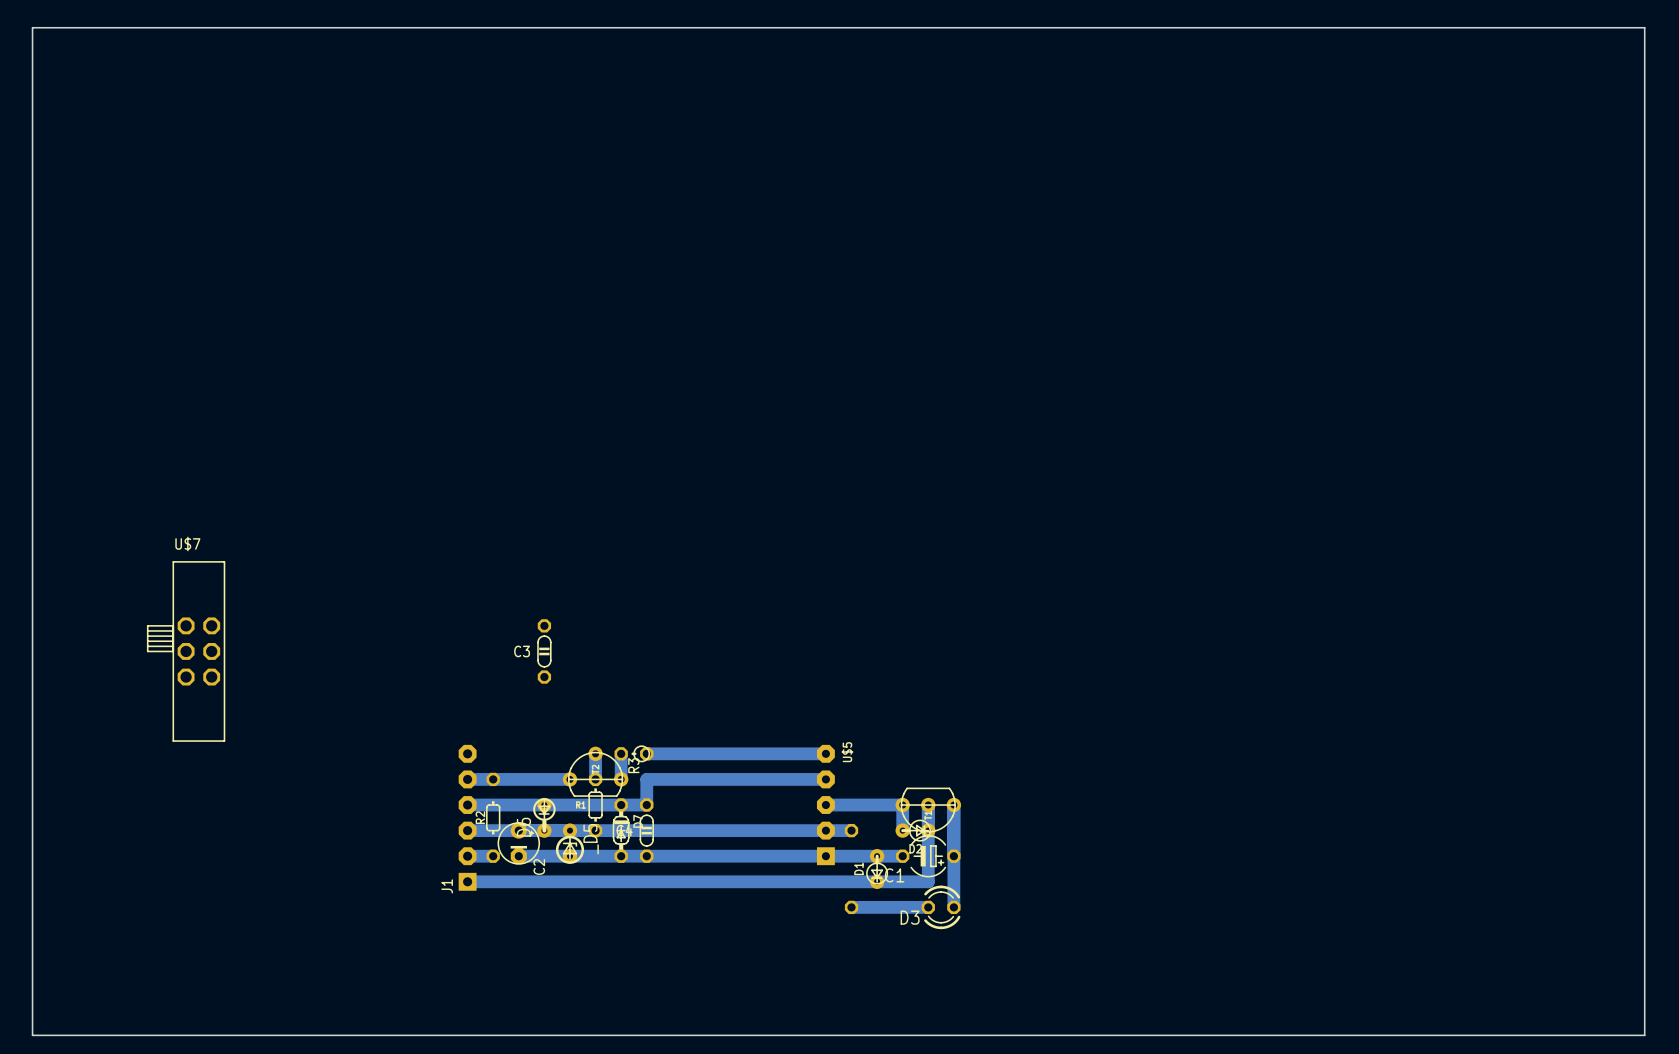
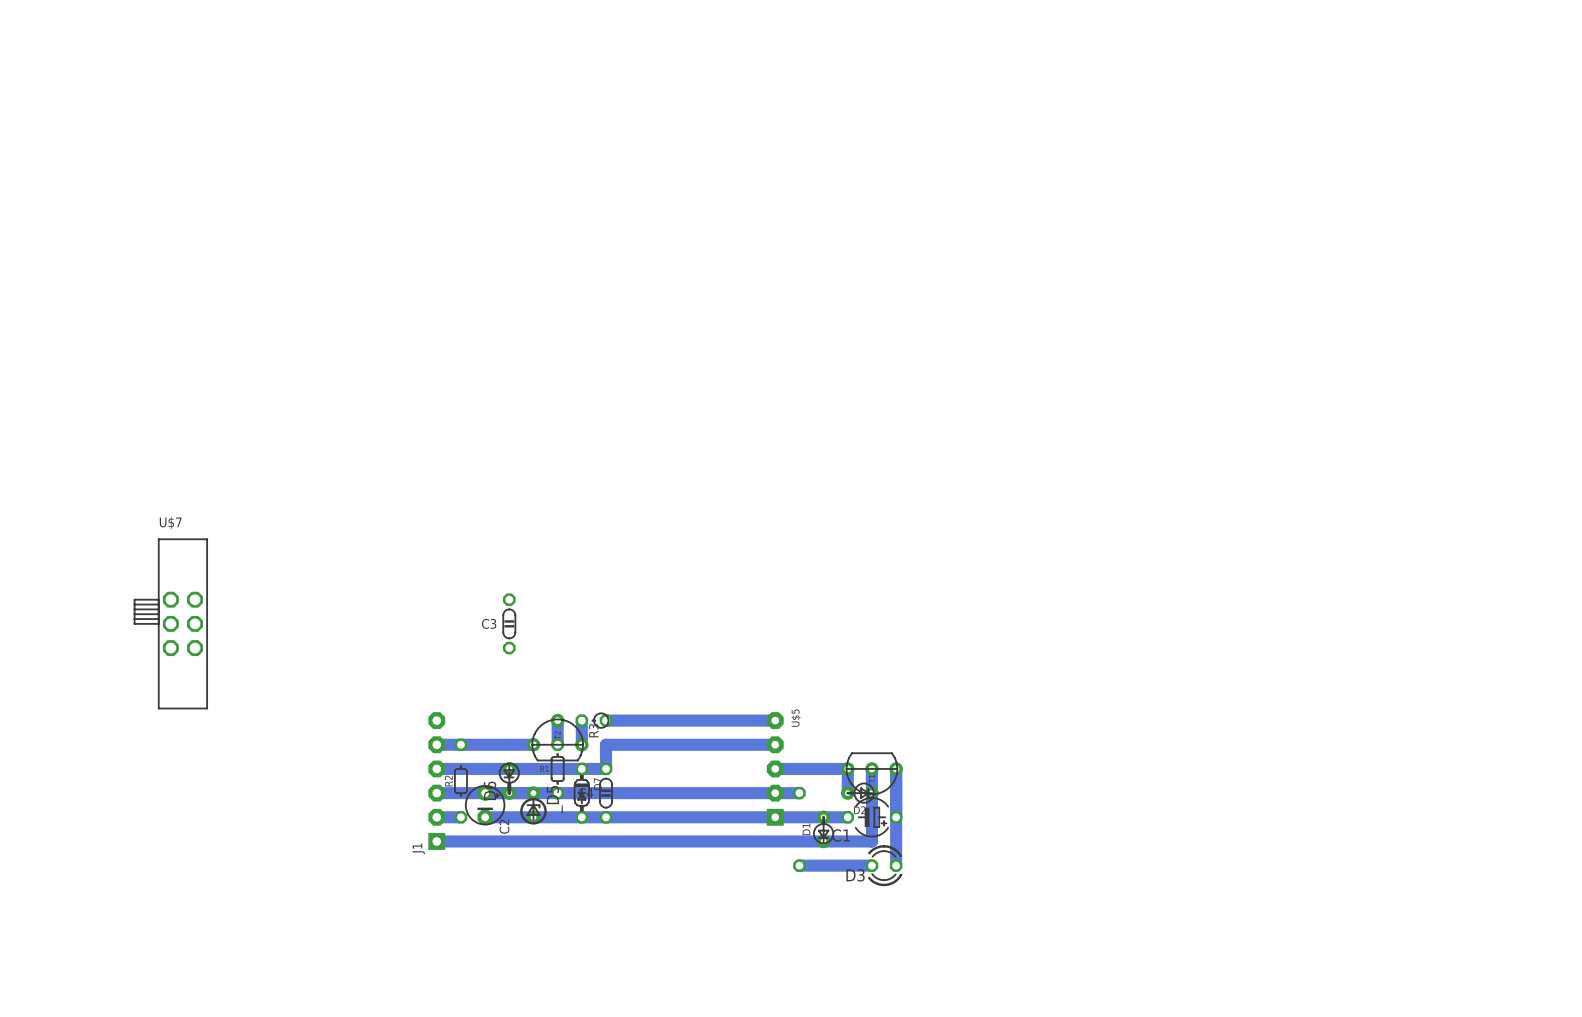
board edge: (32, 27) (1644, 27) (1644, 1035) (32, 1035) (32, 27) -> none

